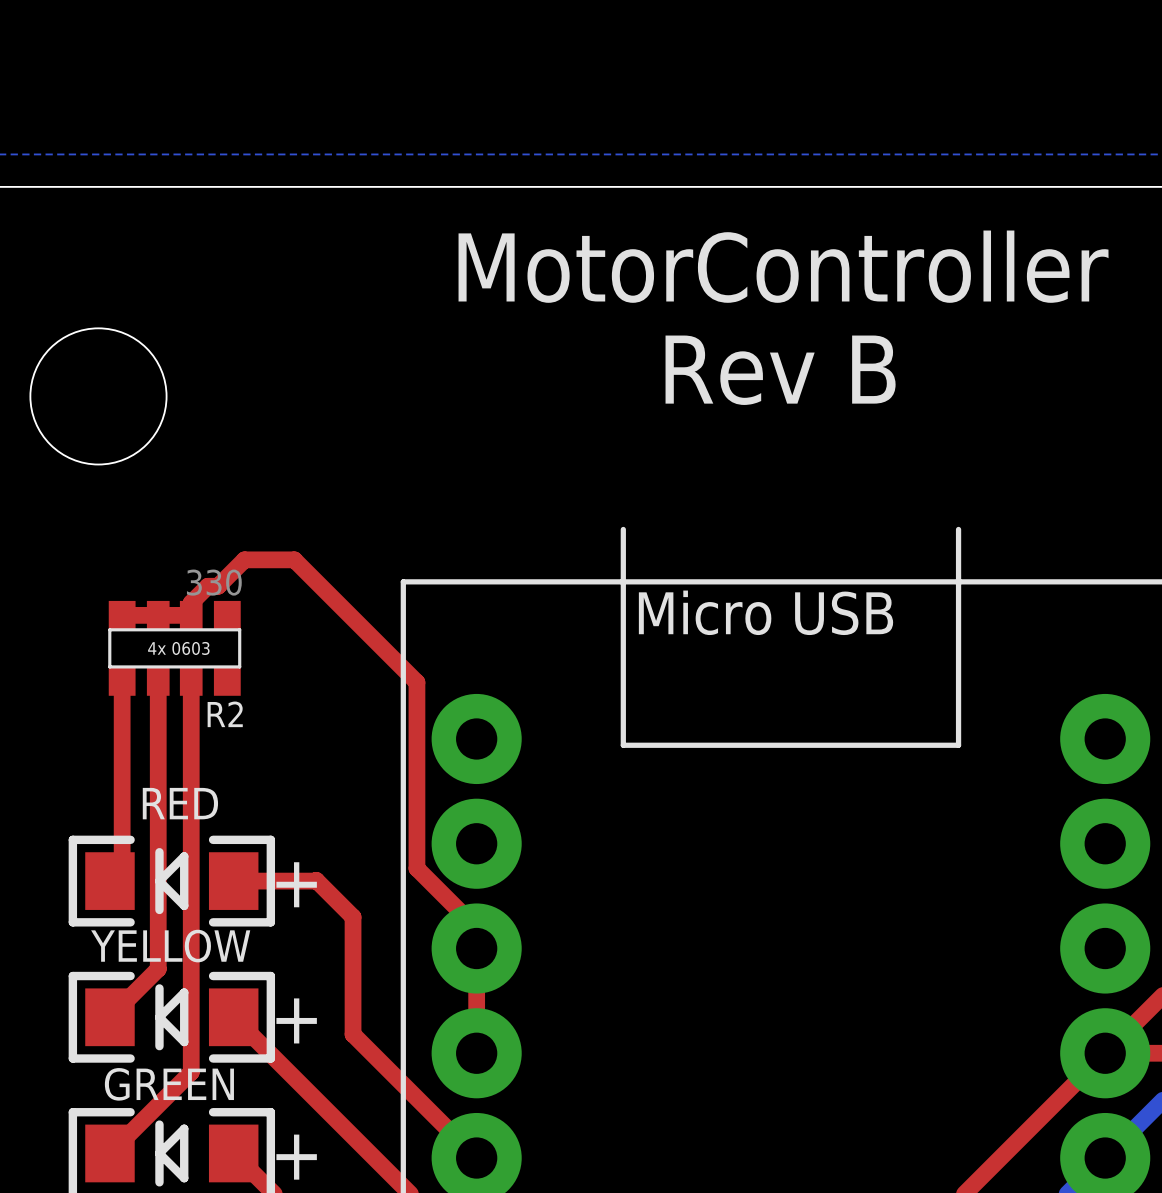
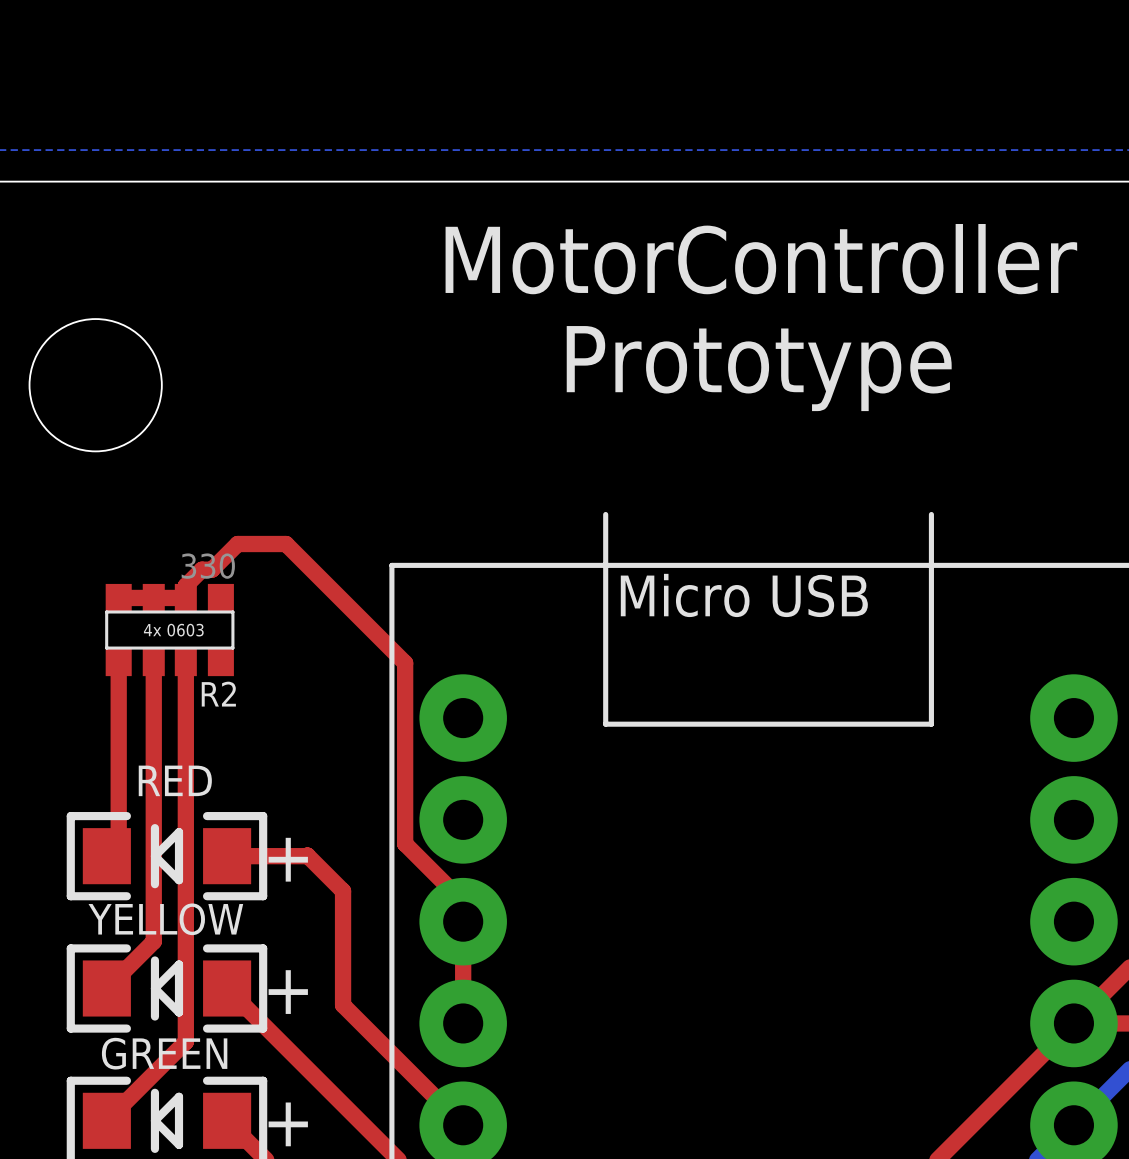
text: Rev B (780, 370) -> Prototype (759, 368)

